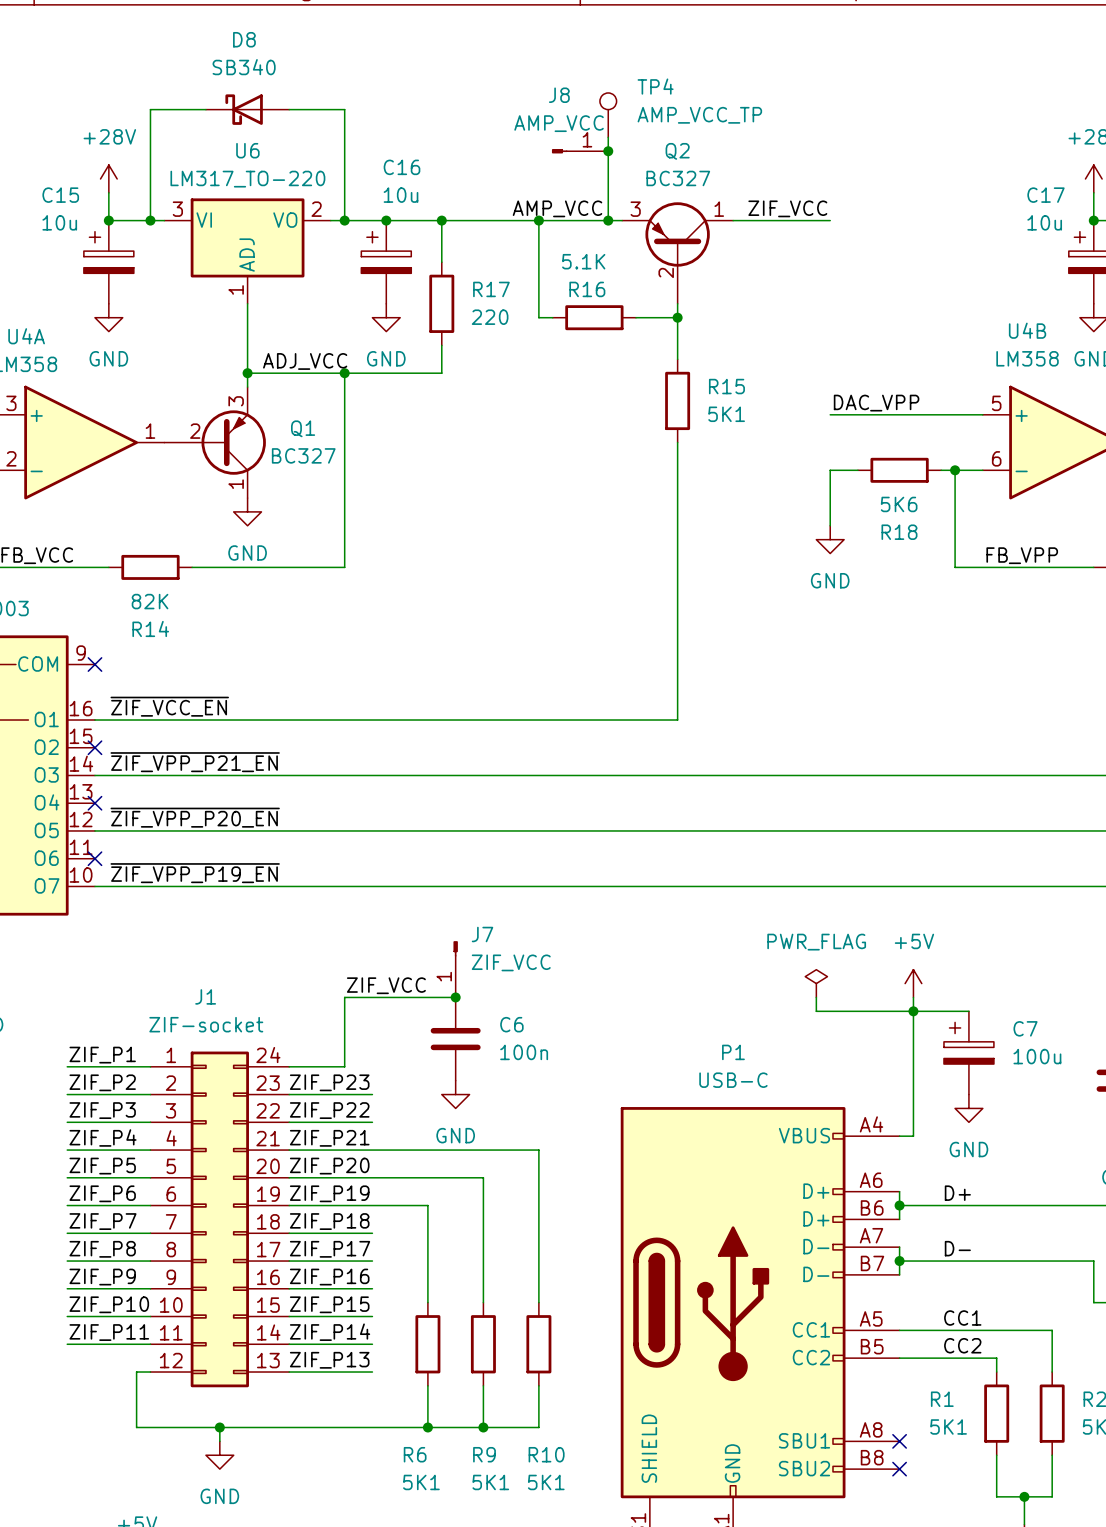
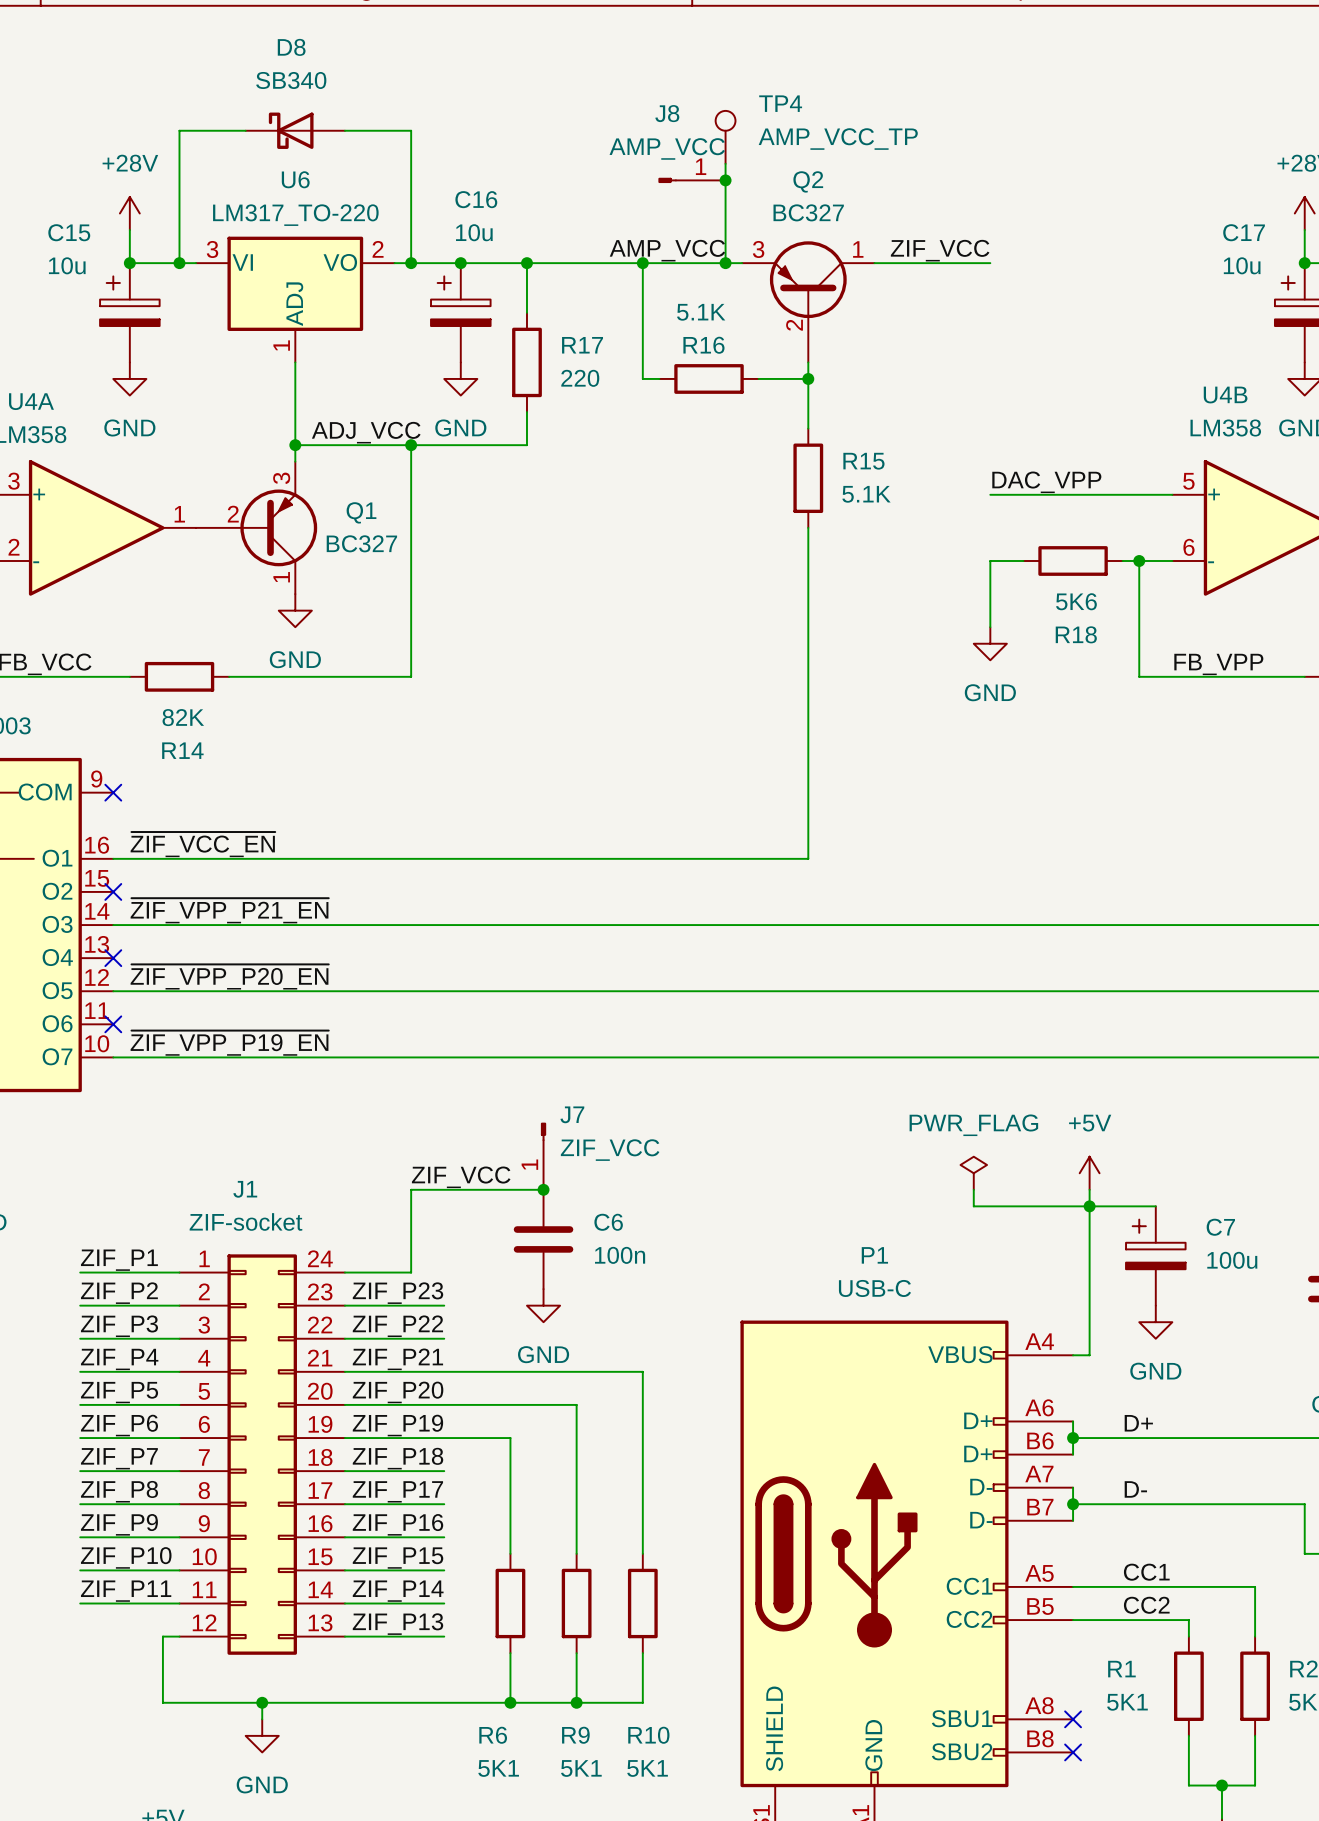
R15 value: 5K1 (726, 414) -> 5.1K (866, 494)

